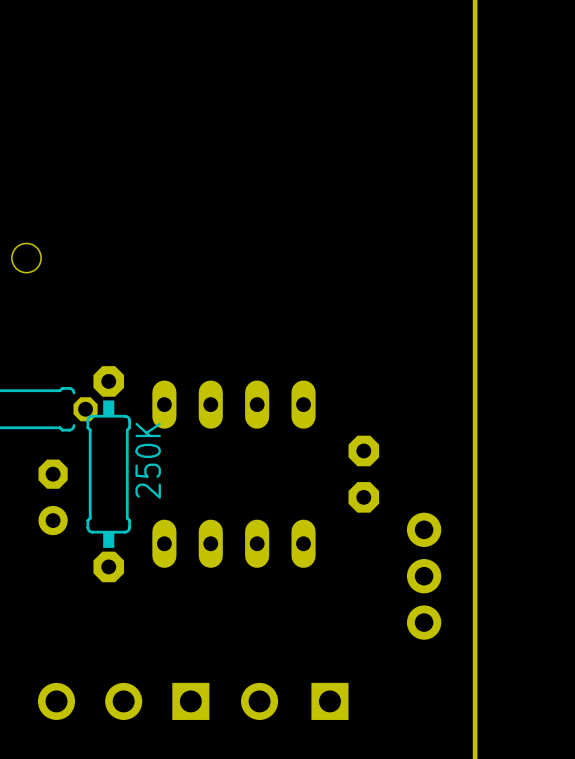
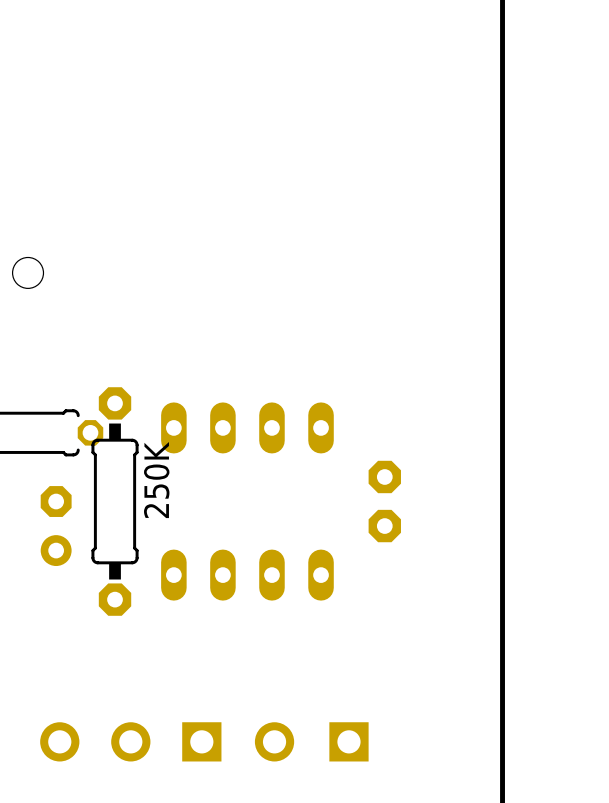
part: (424, 576) -> none

